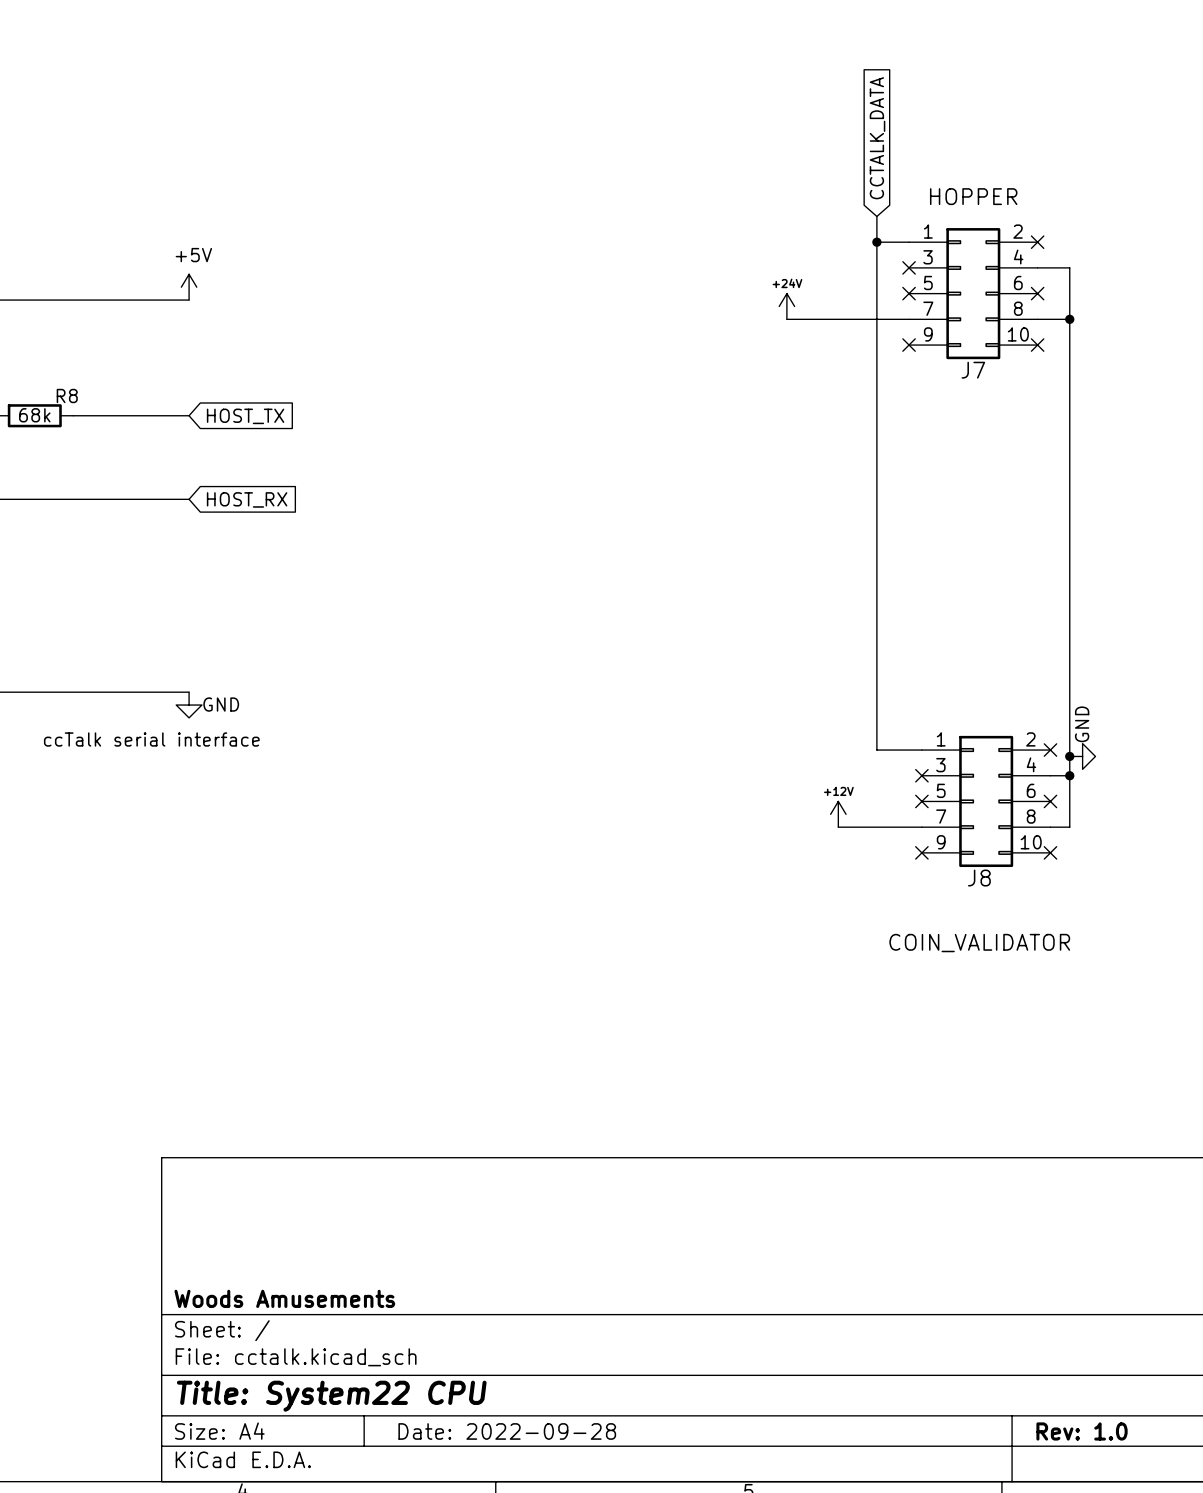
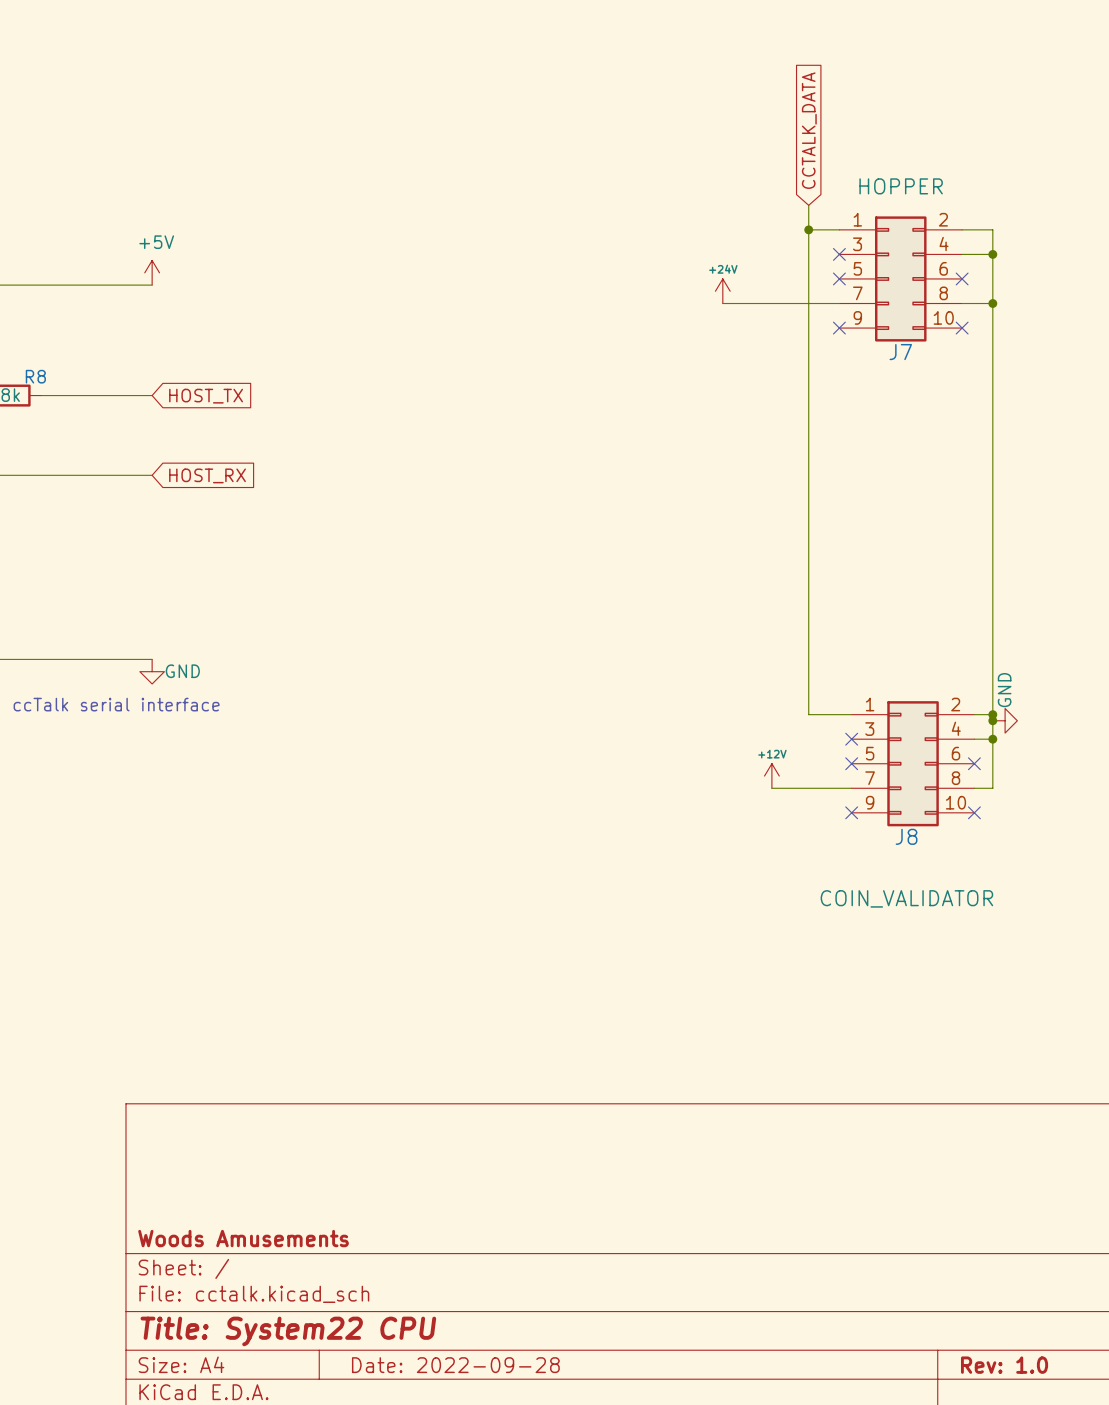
wire: none -> (962, 229) (992, 229) (992, 254)
no-connect mark: (1037, 242) -> none
junction: none -> (992, 254)
wire: none -> (974, 714) (992, 714)
no-connect mark: (1050, 750) -> none
junction: none -> (992, 714)

